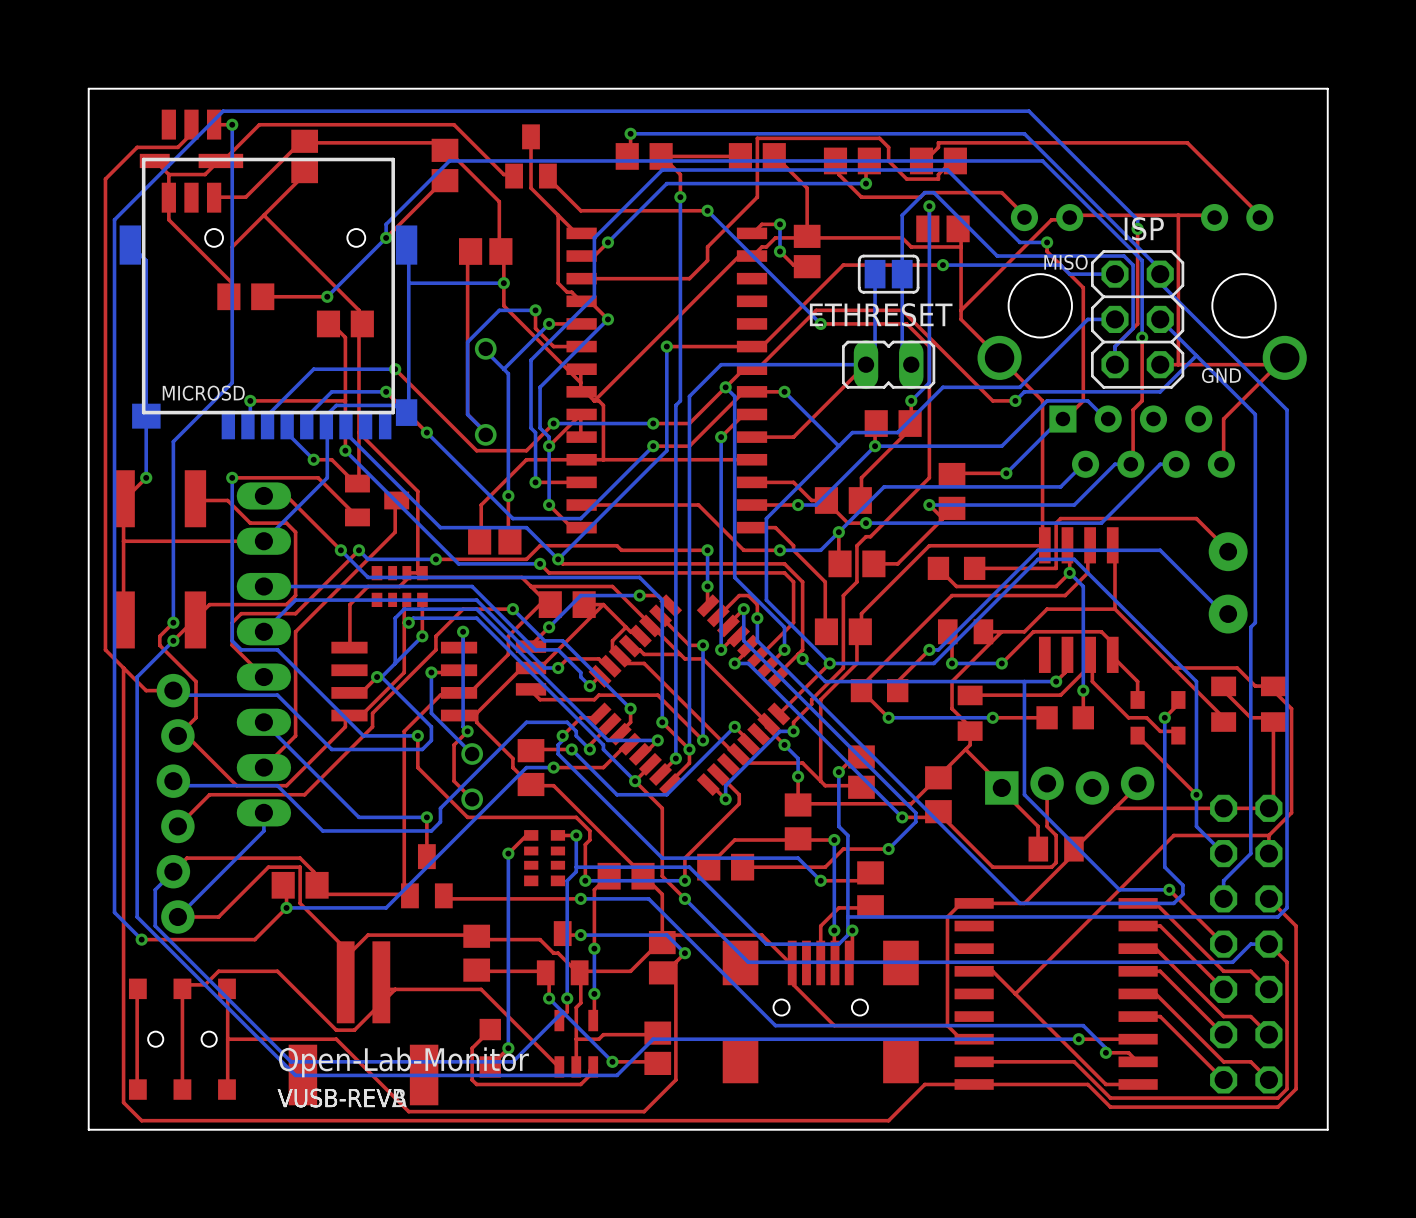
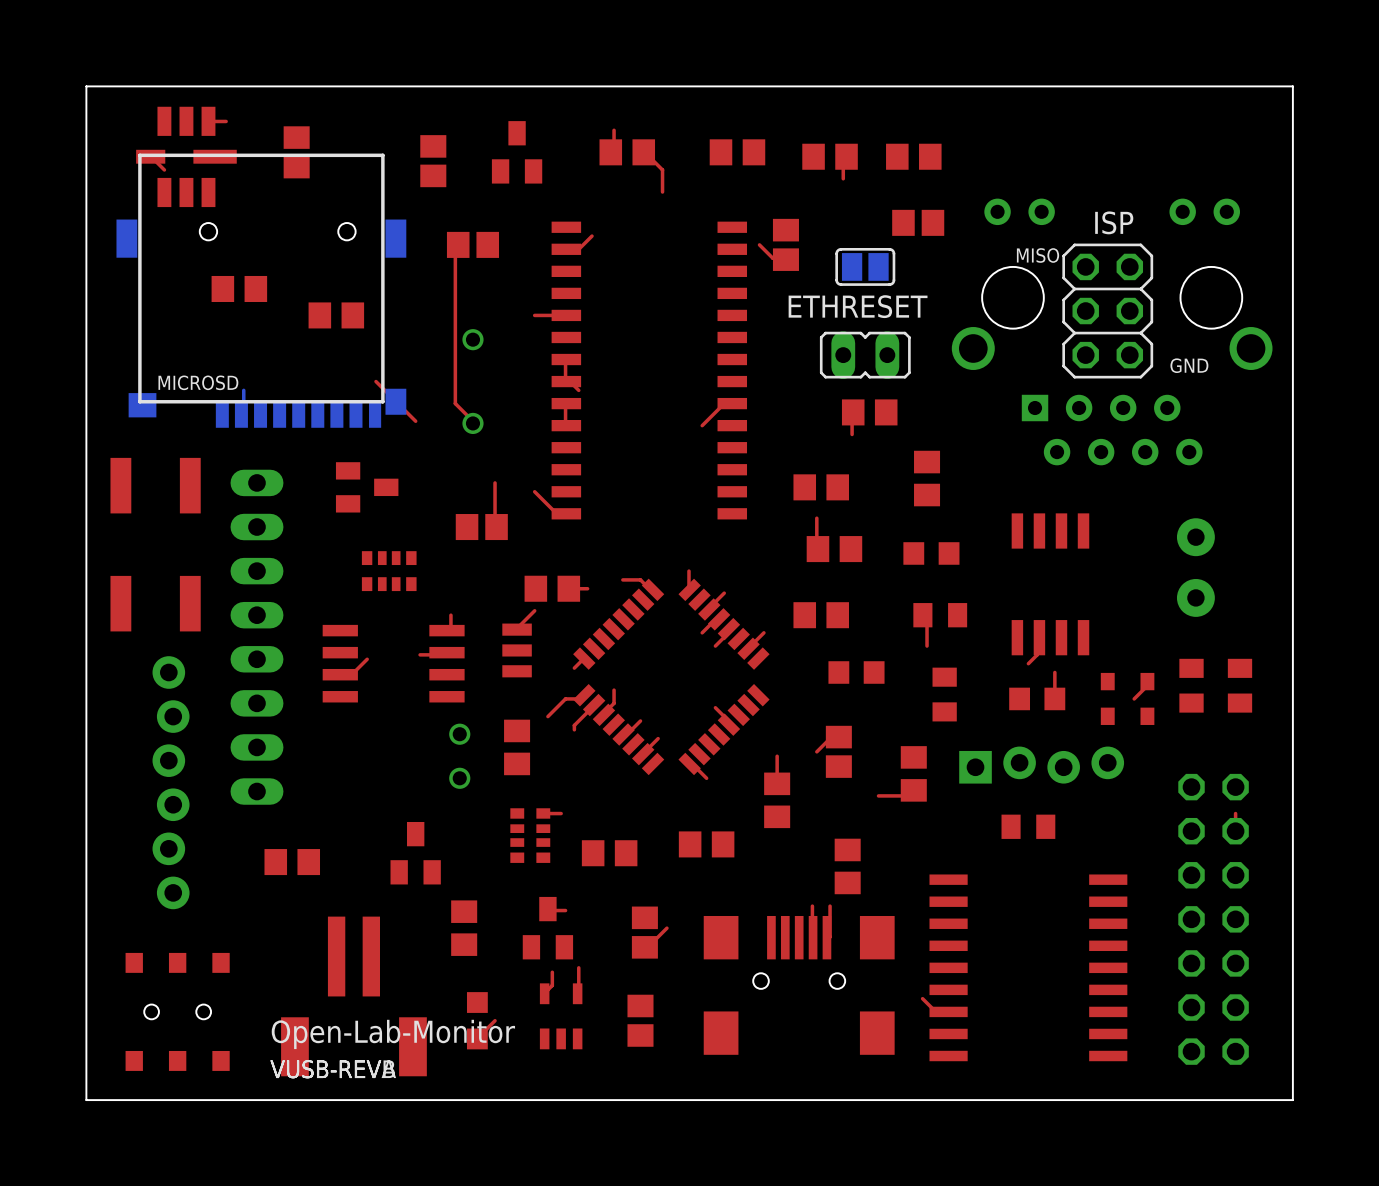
top track: (191, 124) (191, 133) (177, 147) (137, 147) (105, 179) (105, 649) (146, 690) (173, 690) -> none
bottom track: (232, 124) (232, 382) (173, 441) (173, 622) -> none
via: (232, 124) -> none
bottom track: (630, 133) (1024, 133) (1160, 269) (1160, 283) (1287, 409) (1287, 907) (1277, 916) (847, 916) -> none
via: (630, 133) -> none
top track: (531, 136) (531, 188) (576, 233) (581, 233) -> none
top track: (740, 156) (661, 156) -> none
top track: (774, 156) (807, 188) (807, 237) -> none
top track: (835, 160) (838, 160) (838, 174) (861, 197) (920, 197) (924, 192) (1001, 192) (1024, 215) (1024, 217) -> none
top track: (921, 160) (924, 160) (938, 147) (938, 142) (1187, 142) (1259, 215) (1259, 217) -> none
top track: (955, 160) (952, 160) (938, 174) (938, 179) (906, 179) (888, 160) (888, 147) (879, 138) (757, 138) (757, 197) (707, 246) (707, 260) (689, 278) (581, 278) -> none
top track: (304, 171) (304, 174) (232, 246) (232, 296) (228, 296) -> none
top track: (514, 176) (503, 174) (454, 124) (259, 124) (223, 160) (218, 160) (205, 174) (168, 174) (168, 219) (232, 283) -> none
top track: (547, 176) (580, 210) (707, 210) -> none
top track: (444, 180) (444, 179) (386, 237) -> none
bottom track: (866, 183) (666, 183) (607, 242) -> none
via: (866, 183) -> none
top track: (214, 197) (245, 197) (304, 138) (304, 142) (440, 142) (499, 201) (499, 251) (503, 251) (503, 305) (580, 382) -> none
bottom track: (680, 197) (680, 400) (675, 405) (675, 758) -> none
via: (680, 197) -> none
bottom track: (929, 206) (929, 382) (911, 400) -> none
via: (929, 206) -> none
bottom track: (707, 210) (820, 323) -> none
via: (707, 210) -> none
top track: (263, 215) (358, 310) (358, 482) (354, 482) (331, 459) (313, 459) -> none
top track: (558, 215) (558, 283) (580, 301) (589, 301) (607, 319) -> none
top track: (1178, 215) (1178, 364) -> none
top track: (1214, 217) (1214, 215) (1069, 215) (1069, 219) (1051, 219) (961, 310) -> none
top track: (779, 224) (761, 224) (752, 233) -> none
bottom track: (779, 224) (779, 251) -> none
via: (779, 224) -> none
top track: (958, 228) (961, 228) (961, 319) (1042, 400) (1042, 541) (1044, 545) (929, 545) (861, 613) (861, 631) (856, 631) (856, 663) (820, 699) (820, 781) -> none
top track: (1137, 228) (1137, 323) (1114, 346) (1114, 364) -> none
bottom track: (1137, 228) (1137, 219) (1028, 111) (223, 111) (114, 219) (114, 912) (141, 939) -> none
via: (1137, 228) -> none
via: (386, 237) -> none
via: (607, 242) -> none
top track: (1047, 242) (1047, 251) (1083, 287) (1083, 400) (1065, 419) (1062, 419) -> none
bottom track: (1047, 242) (1019, 242) (947, 170) (662, 170) (594, 237) (594, 296) (531, 360) (531, 428) (535, 432) (535, 482) -> none
via: (1047, 242) -> none
bottom track: (130, 245) (146, 260) (146, 477) -> none
bottom track: (406, 245) (408, 246) (408, 409) (406, 412) (395, 405) (336, 405) (327, 414) (327, 477) (263, 541) -> none
top track: (961, 246) (911, 246) (902, 237) (775, 237) (752, 256) (739, 256) (594, 400) (598, 400) (603, 405) (603, 459) -> none
via: (779, 251) -> none
top track: (942, 265) (843, 265) (761, 346) (666, 346) -> none
bottom track: (942, 265) (1060, 265) (1069, 274) (1114, 274) -> none
via: (942, 265) -> none
bottom track: (875, 274) (875, 355) (866, 364) (721, 364) (689, 396) (689, 749) -> none
bottom track: (503, 283) (408, 283) -> none
via: (503, 283) -> none
top track: (327, 296) (262, 296) -> none
bottom track: (327, 296) (386, 237) (386, 224) (449, 160) (1042, 160) (1142, 260) (1142, 337) -> none
via: (327, 296) -> none
top track: (535, 310) (535, 328) (553, 346) (581, 346) -> none
bottom track: (535, 310) (499, 310) (467, 342) (467, 414) (485, 432) (485, 434) -> none
via: (535, 310) -> none
bottom track: (607, 319) (540, 387) (540, 428) (549, 437) (549, 505) -> none
via: (607, 319) -> none
bottom track: (1114, 319) (1087, 319) (1019, 387) (942, 387) (897, 432) (852, 432) (766, 518) (766, 600) (829, 663) (933, 663) (1038, 559) (1074, 559) (1196, 681) (1196, 826) (1223, 853) -> none
bottom track: (1160, 319) (1255, 414) (1255, 622) (1250, 627) (1250, 853) (1223, 880) (1223, 898) -> none
top track: (328, 323) (331, 323) (345, 337) (345, 450) -> none
bottom track: (549, 323) (503, 369) -> none
via: (549, 323) -> none
top track: (820, 323) (906, 323) (929, 346) (929, 477) (870, 536) (866, 536) (856, 545) (856, 581) (843, 595) (843, 667) (811, 699) (811, 704) (793, 722) (793, 731) -> none
via: (820, 323) -> none
top track: (1142, 337) (1142, 400) (1133, 409) (1133, 464) (1130, 464) -> none
via: (1142, 337) -> none
bottom track: (666, 346) (666, 450) (558, 559) (526, 527) (440, 527) (349, 437) (349, 428) (345, 425) -> none
via: (666, 346) -> none
bottom track: (485, 348) (485, 351) (508, 373) (508, 495) -> none
bottom track: (1196, 355) (1160, 391) (1024, 391) (1015, 400) -> none
top track: (1284, 357) (1223, 419) (1223, 464) (1221, 464) -> none
top track: (866, 364) (793, 437) (752, 437) -> none
bottom track: (1114, 364) (1114, 346) (1133, 328) (1133, 265) (1124, 256) (997, 256) (933, 192) (924, 192) (902, 215) (902, 355) (911, 364) -> none
top track: (1277, 364) (1160, 364) -> none
top track: (395, 369) (476, 450) (526, 450) (553, 423) -> none
bottom track: (395, 369) (313, 369) (268, 414) (267, 425) -> none
via: (395, 369) -> none
bottom track: (725, 387) (734, 396) (734, 577) (784, 627) (784, 649) -> none
via: (725, 387) -> none
bottom track: (386, 391) (331, 391) (309, 414) (309, 423) (306, 425) -> none
via: (386, 391) -> none
top track: (784, 391) (743, 391) (689, 446) (653, 446) -> none
bottom track: (784, 391) (838, 446) -> none
via: (784, 391) -> none
via: (250, 400) -> none
top track: (345, 400) (250, 400) -> none
top track: (911, 400) (911, 423) (906, 423) (906, 432) (861, 477) (860, 500) -> none
via: (911, 400) -> none
top track: (1015, 400) (992, 400) (902, 310) (816, 310) (757, 369) (743, 369) (689, 423) (653, 423) -> none
via: (1015, 400) -> none
top track: (581, 414) (549, 446) -> none
bottom track: (1062, 419) (1060, 419) (1006, 473) -> none
bottom track: (1108, 419) (1105, 419) (1087, 400) (1047, 400) (1001, 446) (875, 446) (816, 505) (798, 505) -> none
via: (553, 423) -> none
bottom track: (653, 423) (553, 423) -> none
via: (653, 423) -> none
bottom track: (287, 425) (291, 428) (291, 437) (313, 459) -> none
top track: (358, 432) (417, 491) (417, 572) (422, 573) (426, 577) (521, 577) (550, 604) (544, 600) (508, 636) (508, 654) (472, 690) (463, 690) (458, 695) (440, 695) (404, 731) (404, 894) (409, 895) (327, 894) (318, 885) (313, 885) (313, 871) (300, 858) (186, 858) (173, 871) -> none
bottom track: (426, 432) (512, 518) (580, 518) (653, 446) -> none
via: (426, 432) -> none
bottom track: (721, 437) (721, 649) -> none
via: (721, 437) -> none
via: (549, 446) -> none
via: (653, 446) -> none
via: (875, 446) -> none
bottom track: (345, 450) (458, 563) (540, 563) -> none
via: (345, 450) -> none
via: (313, 459) -> none
top track: (752, 459) (526, 459) (481, 505) (481, 541) (479, 541) -> none
bottom track: (1085, 464) (1083, 464) (1060, 486) (884, 486) (820, 550) (779, 550) -> none
bottom track: (1130, 464) (1114, 464) (1074, 505) (929, 505) -> none
bottom track: (1176, 464) (1160, 464) (1101, 523) (866, 523) -> none
top track: (1006, 473) (952, 474) -> none
via: (1006, 473) -> none
top track: (146, 477) (123, 500) (124, 619) -> none
via: (146, 477) -> none
top track: (232, 477) (318, 477) (357, 517) -> none
bottom track: (232, 477) (232, 640) (241, 649) (277, 649) (363, 735) (417, 735) -> none
via: (232, 477) -> none
via: (535, 482) -> none
top track: (581, 482) (535, 482) -> none
top track: (752, 482) (793, 482) (811, 500) (826, 500) -> none
top track: (263, 495) (286, 495) (340, 550) -> none
via: (508, 495) -> none
top track: (195, 498) (196, 500) (227, 500) (250, 523) (286, 523) (295, 532) (295, 595) (286, 604) (209, 604) (173, 640) -> none
top track: (396, 500) (395, 532) (295, 631) (295, 735) (263, 767) -> none
top track: (825, 500) (847, 523) (866, 523) -> none
via: (549, 505) -> none
top track: (581, 505) (698, 505) (743, 550) (779, 550) -> none
top track: (798, 505) (752, 505) -> none
via: (798, 505) -> none
top track: (929, 505) (942, 518) (952, 509) (897, 563) (873, 563) -> none
via: (929, 505) -> none
via: (866, 523) -> none
top track: (752, 527) (775, 527) (793, 545) (793, 550) (825, 581) (826, 631) -> none
via: (838, 532) -> none
top track: (263, 541) (123, 541) -> none
top track: (1110, 541) (1114, 545) (1114, 609) -> none
top track: (1067, 545) (1069, 545) (1069, 572) (1056, 586) (956, 586) (938, 568) -> none
top track: (1090, 545) (1087, 545) (1087, 572) (1065, 595) (952, 595) (861, 686) (861, 690) (888, 717) -> none
bottom track: (340, 550) (368, 577) (639, 577) (662, 600) (662, 722) -> none
via: (340, 550) -> none
top track: (358, 550) (295, 613) (241, 613) (232, 622) (232, 645) (263, 677) -> none
bottom track: (358, 550) (368, 559) (435, 559) -> none
via: (358, 550) -> none
top track: (707, 550) (621, 550) (617, 545) (540, 545) (526, 559) (435, 559) -> none
bottom track: (707, 550) (707, 586) -> none
via: (707, 550) -> none
via: (779, 550) -> none
top track: (1228, 551) (1196, 518) (1060, 518) (1056, 523) (1056, 568) (974, 568) -> none
via: (435, 559) -> none
top track: (558, 559) (562, 563) (784, 563) (802, 581) (802, 649) (779, 672) (778, 676) -> none
via: (558, 559) -> none
top track: (540, 563) (549, 572) (784, 572) (793, 581) (793, 622) (758, 656) -> none
via: (540, 563) -> none
top track: (422, 572) (406, 573) (408, 577) (399, 586) (368, 586) (349, 604) (349, 647) -> none
bottom track: (1069, 572) (1083, 586) (1083, 690) -> none
via: (1069, 572) -> none
bottom track: (263, 586) (472, 586) (535, 649) (558, 649) (580, 672) (580, 677) (589, 686) -> none
top track: (531, 586) (612, 586) (684, 658) (703, 658) (768, 724) (766, 726) (784, 744) -> none
via: (707, 586) -> none
bottom track: (639, 595) (580, 595) (549, 627) -> none
via: (639, 595) -> none
top track: (406, 599) (404, 600) (404, 672) (363, 713) (349, 713) (345, 717) (345, 726) (286, 785) (236, 785) (182, 731) -> none
top track: (422, 600) (422, 636) -> none
top track: (512, 609) (463, 609) (435, 636) (435, 649) (372, 713) (372, 726) (304, 794) (209, 794) (177, 826) -> none
bottom track: (512, 609) (544, 640) (562, 640) (630, 708) -> none
via: (512, 609) -> none
bottom track: (743, 609) (743, 640) (915, 812) (915, 821) (888, 849) -> none
via: (743, 609) -> none
top track: (1114, 609) (1223, 717) (1223, 722) -> none
top track: (1114, 609) (1047, 609) (1024, 631) (983, 631) -> none
bottom track: (1228, 614) (1228, 618) (1160, 550) (1038, 550) (938, 649) (929, 649) -> none
top track: (660, 615) (689, 645) (703, 645) -> none
top track: (718, 615) (739, 595) (748, 595) (757, 604) (757, 618) -> none
bottom track: (757, 618) (757, 640) (1019, 903) (1173, 903) (1182, 894) (1182, 885) (1164, 867) (1164, 717) -> none
via: (757, 618) -> none
top track: (173, 622) (159, 636) (159, 645) (196, 681) (196, 717) (177, 735) -> none
via: (173, 622) -> none
bottom track: (408, 622) (413, 618) (476, 618) (603, 744) (603, 749) (635, 781) -> none
via: (408, 622) -> none
via: (549, 627) -> none
top track: (626, 627) (612, 640) (612, 649) (626, 663) (644, 663) (734, 754) (738, 754) (739, 758) (743, 763) (802, 763) (825, 785) (861, 785) (861, 787) -> none
bottom track: (263, 631) (295, 600) (476, 600) (544, 667) (558, 667) -> none
bottom track: (463, 631) (463, 726) (467, 731) -> none
via: (463, 631) -> none
top track: (1001, 631) (952, 681) (952, 708) (970, 726) (970, 744) (911, 803) (798, 803) -> none
bottom track: (422, 636) (381, 677) -> none
via: (422, 636) -> none
top track: (640, 636) (639, 631) (630, 631) (603, 604) (540, 667) (521, 667) (476, 713) -> none
bottom track: (173, 640) (137, 677) (137, 916) (295, 1075) (617, 1075) (653, 1039) (1078, 1039) -> none
via: (173, 640) -> none
bottom track: (703, 645) (703, 740) -> none
via: (703, 645) -> none
top track: (630, 646) (630, 649) (639, 649) (644, 654) (680, 654) -> none
via: (721, 649) -> none
via: (784, 649) -> none
top track: (929, 649) (897, 681) (897, 690) -> none
via: (929, 649) -> none
bottom track: (802, 658) (825, 681) (1056, 681) -> none
via: (802, 658) -> none
bottom track: (395, 663) (395, 618) (404, 609) (476, 609) (607, 740) (657, 740) -> none
bottom track: (734, 663) (748, 663) (902, 817) -> none
via: (734, 663) -> none
top track: (829, 663) (778, 713) -> none
via: (829, 663) -> none
via: (952, 663) -> none
top track: (1001, 663) (1033, 631) (1101, 631) (1110, 640) (1110, 654) (1137, 681) (1137, 699) -> none
bottom track: (1001, 663) (952, 663) -> none
via: (1001, 663) -> none
top track: (610, 666) (598, 658) (567, 658) (558, 667) -> none
top track: (123, 667) (123, 1102) (141, 1120) (888, 1120) (924, 1084) (1087, 1084) (1110, 1107) (1277, 1107) (1296, 1089) (1296, 926) (1268, 898) -> none
via: (558, 667) -> none
top track: (1173, 667) (1237, 667) (1255, 686) (1273, 686) (1273, 690) (1291, 708) (1291, 812) (1268, 835) (1173, 835) (1015, 993) -> none
bottom track: (431, 672) (431, 713) (472, 754) -> none
via: (431, 672) -> none
via: (377, 677) -> none
bottom track: (381, 677) (431, 726) (431, 740) (422, 749) (331, 749) (277, 695) (177, 695) (173, 690) -> none
bottom track: (1024, 681) (1024, 794) (1119, 889) (1169, 889) -> none
via: (1056, 681) -> none
via: (589, 686) -> none
top track: (1223, 686) (1223, 690) (1250, 717) (1273, 717) (1273, 803) (1268, 808) (1114, 808) -> none
top track: (531, 689) (540, 699) (594, 699) (598, 695) (657, 695) (703, 740) -> none
via: (1083, 690) -> none
top track: (970, 695) (1060, 695) (1092, 663) (1090, 654) (1092, 658) (1092, 681) (1128, 717) (1146, 717) (1160, 731) (1178, 731) (1178, 735) -> none
via: (630, 708) -> none
top track: (476, 713) (476, 722) (512, 758) (512, 767) (531, 785) -> none
via: (888, 717) -> none
bottom track: (992, 717) (888, 717) -> none
via: (992, 717) -> none
top track: (1047, 717) (992, 717) -> none
via: (1164, 717) -> none
bottom track: (263, 722) (358, 817) (426, 817) -> none
top track: (662, 722) (689, 749) (689, 763) (671, 781) (670, 784) -> none
via: (662, 722) -> none
bottom track: (734, 726) (666, 794) (617, 794) (571, 749) -> none
via: (734, 726) -> none
top track: (467, 731) (454, 744) (454, 781) (472, 799) -> none
via: (467, 731) -> none
bottom track: (793, 731) (779, 731) (725, 785) (725, 799) -> none
via: (793, 731) -> none
top track: (417, 735) (417, 767) (467, 817) (576, 817) (589, 830) (589, 840) (585, 844) (585, 880) -> none
via: (417, 735) -> none
bottom track: (562, 735) (562, 740) (558, 744) (558, 754) (662, 858) (798, 858) (820, 880) -> none
via: (562, 735) -> none
top track: (1137, 735) (1196, 794) -> none
via: (657, 740) -> none
via: (703, 740) -> none
top track: (630, 744) (626, 744) (603, 767) (553, 767) -> none
bottom track: (784, 744) (798, 758) (798, 776) -> none
via: (784, 744) -> none
top track: (571, 749) (531, 750) -> none
via: (571, 749) -> none
bottom track: (589, 749) (576, 735) (576, 731) (567, 722) (526, 722) (440, 808) (440, 821) (431, 830) (322, 830) (277, 785) (177, 785) (173, 781) -> none
via: (589, 749) -> none
via: (689, 749) -> none
top track: (965, 749) (1001, 785) (1001, 790) (1038, 826) (1038, 849) -> none
via: (675, 758) -> none
top track: (650, 764) (635, 781) (662, 808) (662, 876) (684, 898) -> none
bottom track: (553, 767) (526, 767) (386, 907) (286, 907) -> none
via: (553, 767) -> none
bottom track: (838, 772) (838, 826) (847, 835) (847, 935) (838, 944) (766, 944) (689, 867) (576, 867) -> none
via: (838, 772) -> none
top track: (718, 774) (739, 794) (739, 803) (684, 858) (684, 880) -> none
via: (798, 776) -> none
via: (635, 781) -> none
top track: (1047, 783) (1047, 826) (1056, 835) (1056, 862) (1051, 867) (992, 867) (938, 811) -> none
top track: (1137, 783) (1137, 785) (1074, 849) (1069, 849) (1069, 858) (1024, 903) (961, 903) (947, 916) (947, 1025) (834, 1025) (793, 984) (792, 962) (789, 962) (761, 935) (662, 935) -> none
top track: (531, 785) (553, 785) (662, 894) (662, 942) -> none
via: (1196, 794) -> none
via: (725, 799) -> none
bottom track: (263, 812) (263, 830) (177, 916) -> none
top track: (426, 817) (426, 856) -> none
via: (426, 817) -> none
via: (902, 817) -> none
top track: (531, 835) (526, 835) (508, 853) -> none
bottom track: (576, 835) (576, 871) (567, 880) (567, 998) -> none
via: (576, 835) -> none
top track: (834, 840) (734, 840) (708, 867) -> none
bottom track: (834, 840) (834, 930) -> none
via: (834, 840) -> none
top track: (888, 849) (843, 849) (825, 867) (742, 867) -> none
via: (888, 849) -> none
bottom track: (508, 853) (508, 1048) -> none
via: (508, 853) -> none
bottom track: (173, 871) (155, 889) (155, 926) (291, 1061) (512, 1061) (562, 1012) -> none
top track: (870, 872) (870, 876) (866, 880) (820, 880) -> none
top track: (609, 876) (594, 889) (594, 948) -> none
via: (585, 880) -> none
bottom track: (684, 880) (585, 880) -> none
via: (684, 880) -> none
via: (820, 880) -> none
top track: (283, 885) (286, 885) (286, 907) (254, 939) (141, 939) -> none
top track: (1169, 889) (1223, 944) -> none
via: (1169, 889) -> none
top track: (443, 895) (444, 898) (580, 898) -> none
bottom track: (580, 898) (648, 898) (775, 1025) (1083, 1025) (1105, 1048) (1105, 1052) -> none
via: (580, 898) -> none
bottom track: (684, 898) (748, 962) (1232, 962) (1250, 944) (1268, 944) -> none
via: (684, 898) -> none
top track: (1138, 903) (1155, 903) (1223, 971) (1250, 971) (1268, 989) -> none
top track: (870, 906) (838, 907) (820, 926) (820, 962) -> none
via: (286, 907) -> none
top track: (177, 916) (218, 916) (268, 867) (300, 867) (300, 903) (349, 953) -> none
top track: (1138, 926) (1160, 926) (1223, 989) -> none
via: (834, 930) -> none
via: (852, 930) -> none
bottom track: (580, 935) (666, 935) (684, 953) -> none
via: (580, 935) -> none
via: (141, 939) -> none
top track: (662, 939) (630, 971) (579, 972) -> none
top track: (1268, 944) (1287, 962) (1287, 1089) (1277, 1098) (1110, 1098) (1074, 1061) (974, 1061) -> none
bottom track: (594, 948) (594, 993) -> none
via: (594, 948) -> none
top track: (1138, 948) (1155, 948) (1223, 1016) (1250, 1016) (1268, 1034) -> none
top track: (349, 953) (368, 935) (476, 935) (476, 939) (540, 939) (553, 953) (558, 953) (579, 972) -> none
via: (684, 953) -> none
top track: (675, 962) (675, 1079) (644, 1111) (408, 1111) (336, 1039) (227, 1039) -> none
top track: (476, 970) (544, 971) (549, 975) (549, 998) -> none
top track: (974, 971) (992, 971) (1105, 1084) (1138, 1084) -> none
top track: (1138, 971) (1160, 971) (1223, 1034) -> none
top track: (579, 972) (580, 1002) (576, 1007) (576, 1066) -> none
top track: (381, 982) (386, 989) (481, 989) (559, 1066) -> none
top track: (137, 988) (137, 1089) -> none
top track: (226, 988) (226, 1089) -> none
top track: (395, 989) (354, 1030) (336, 1030) (277, 971) (218, 971) (205, 984) (182, 984) (182, 1089) -> none
via: (594, 993) -> none
top track: (1138, 993) (1155, 993) (1223, 1061) (1250, 1061) (1268, 1079) -> none
bottom track: (549, 998) (612, 1061) -> none
via: (549, 998) -> none
via: (567, 998) -> none
top track: (1138, 1016) (1160, 1016) (1223, 1079) -> none
top track: (490, 1029) (472, 1048) (472, 1079) (476, 1084) (580, 1084) (589, 1075) (589, 1070) (593, 1066) -> none
top track: (657, 1033) (657, 1034) (603, 1034) (598, 1039) (576, 1039) -> none
via: (1078, 1039) -> none
top track: (1138, 1039) (1078, 1039) -> none
via: (508, 1048) -> none
top track: (1105, 1052) (1128, 1052) (1138, 1061) -> none
via: (1105, 1052) -> none
top track: (612, 1061) (657, 1061) (657, 1063) -> none
via: (612, 1061) -> none

